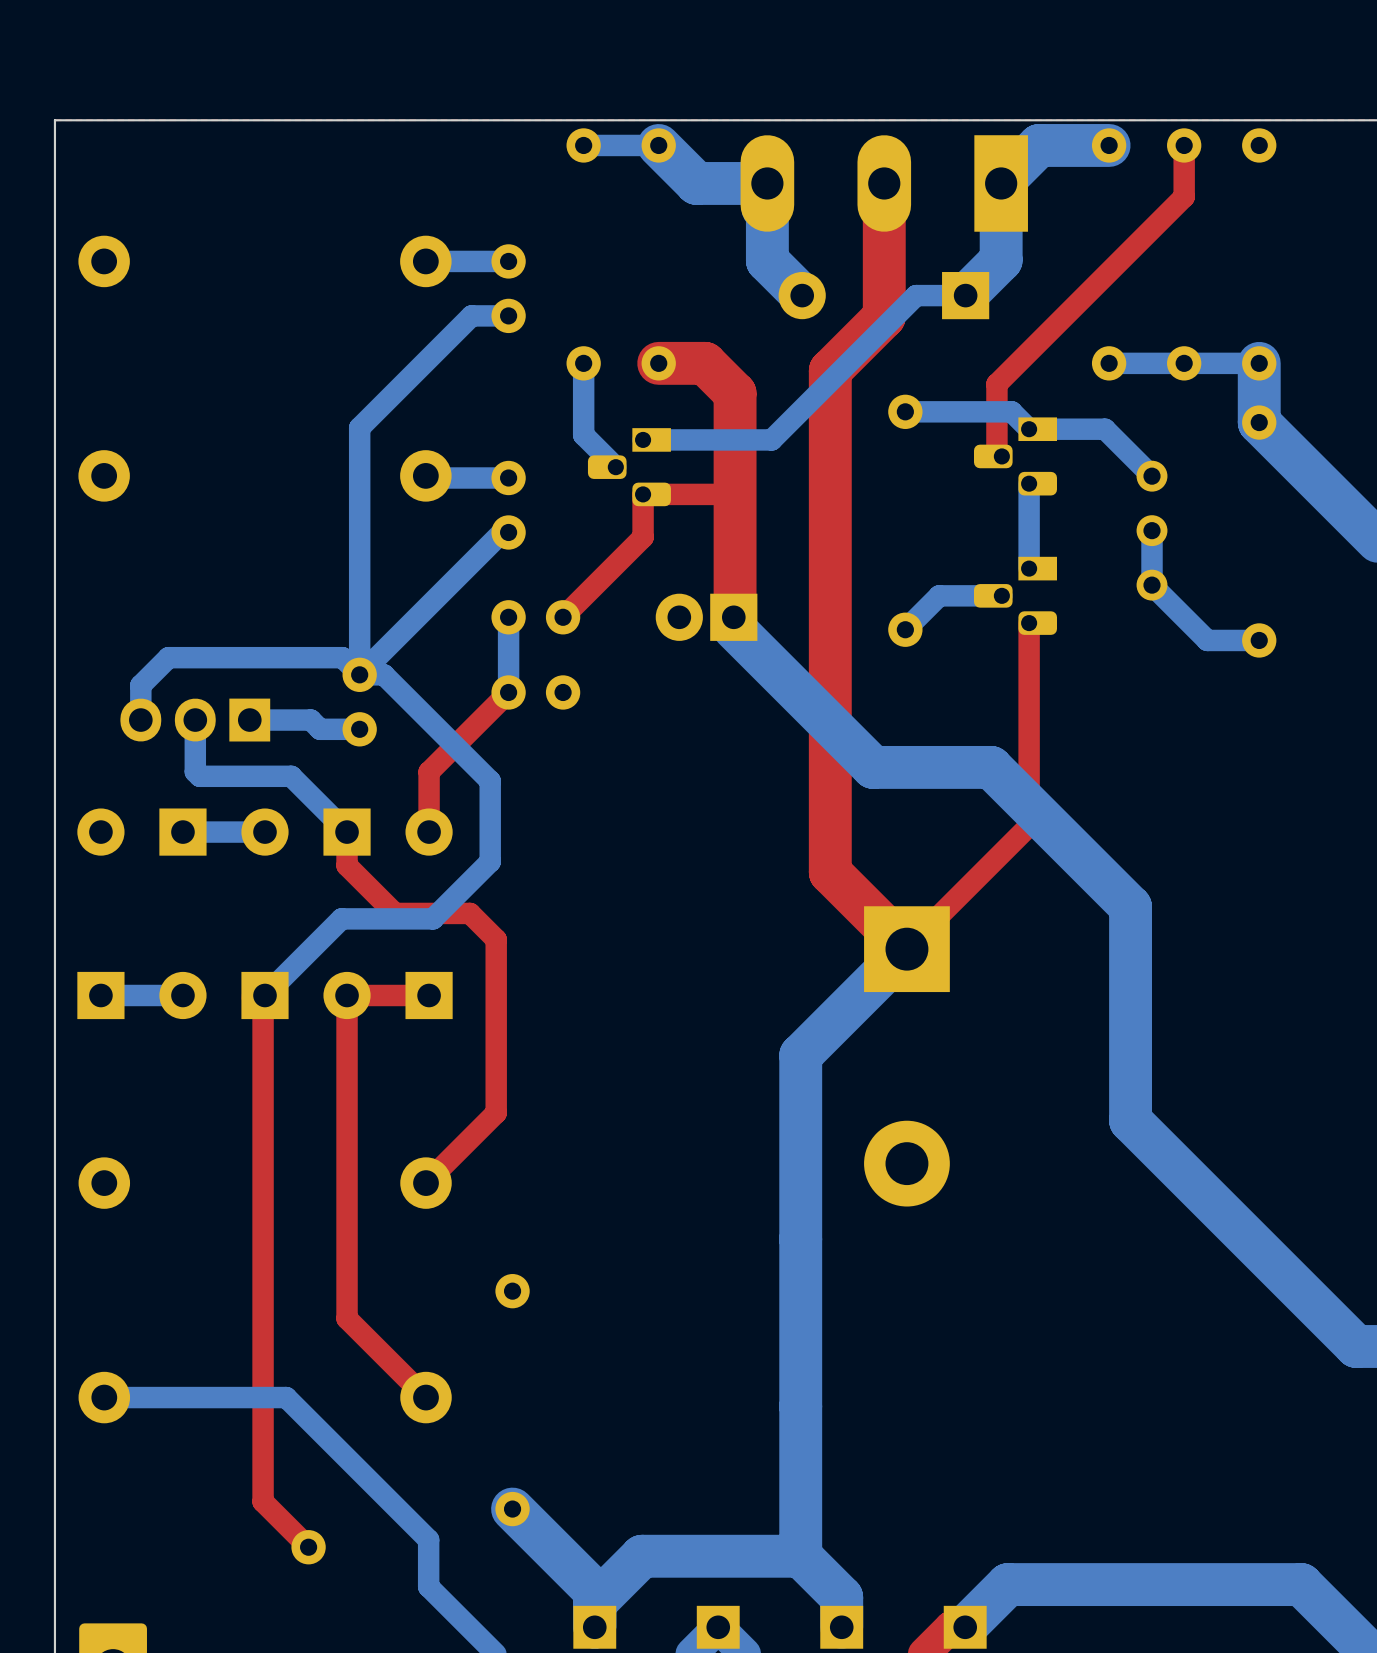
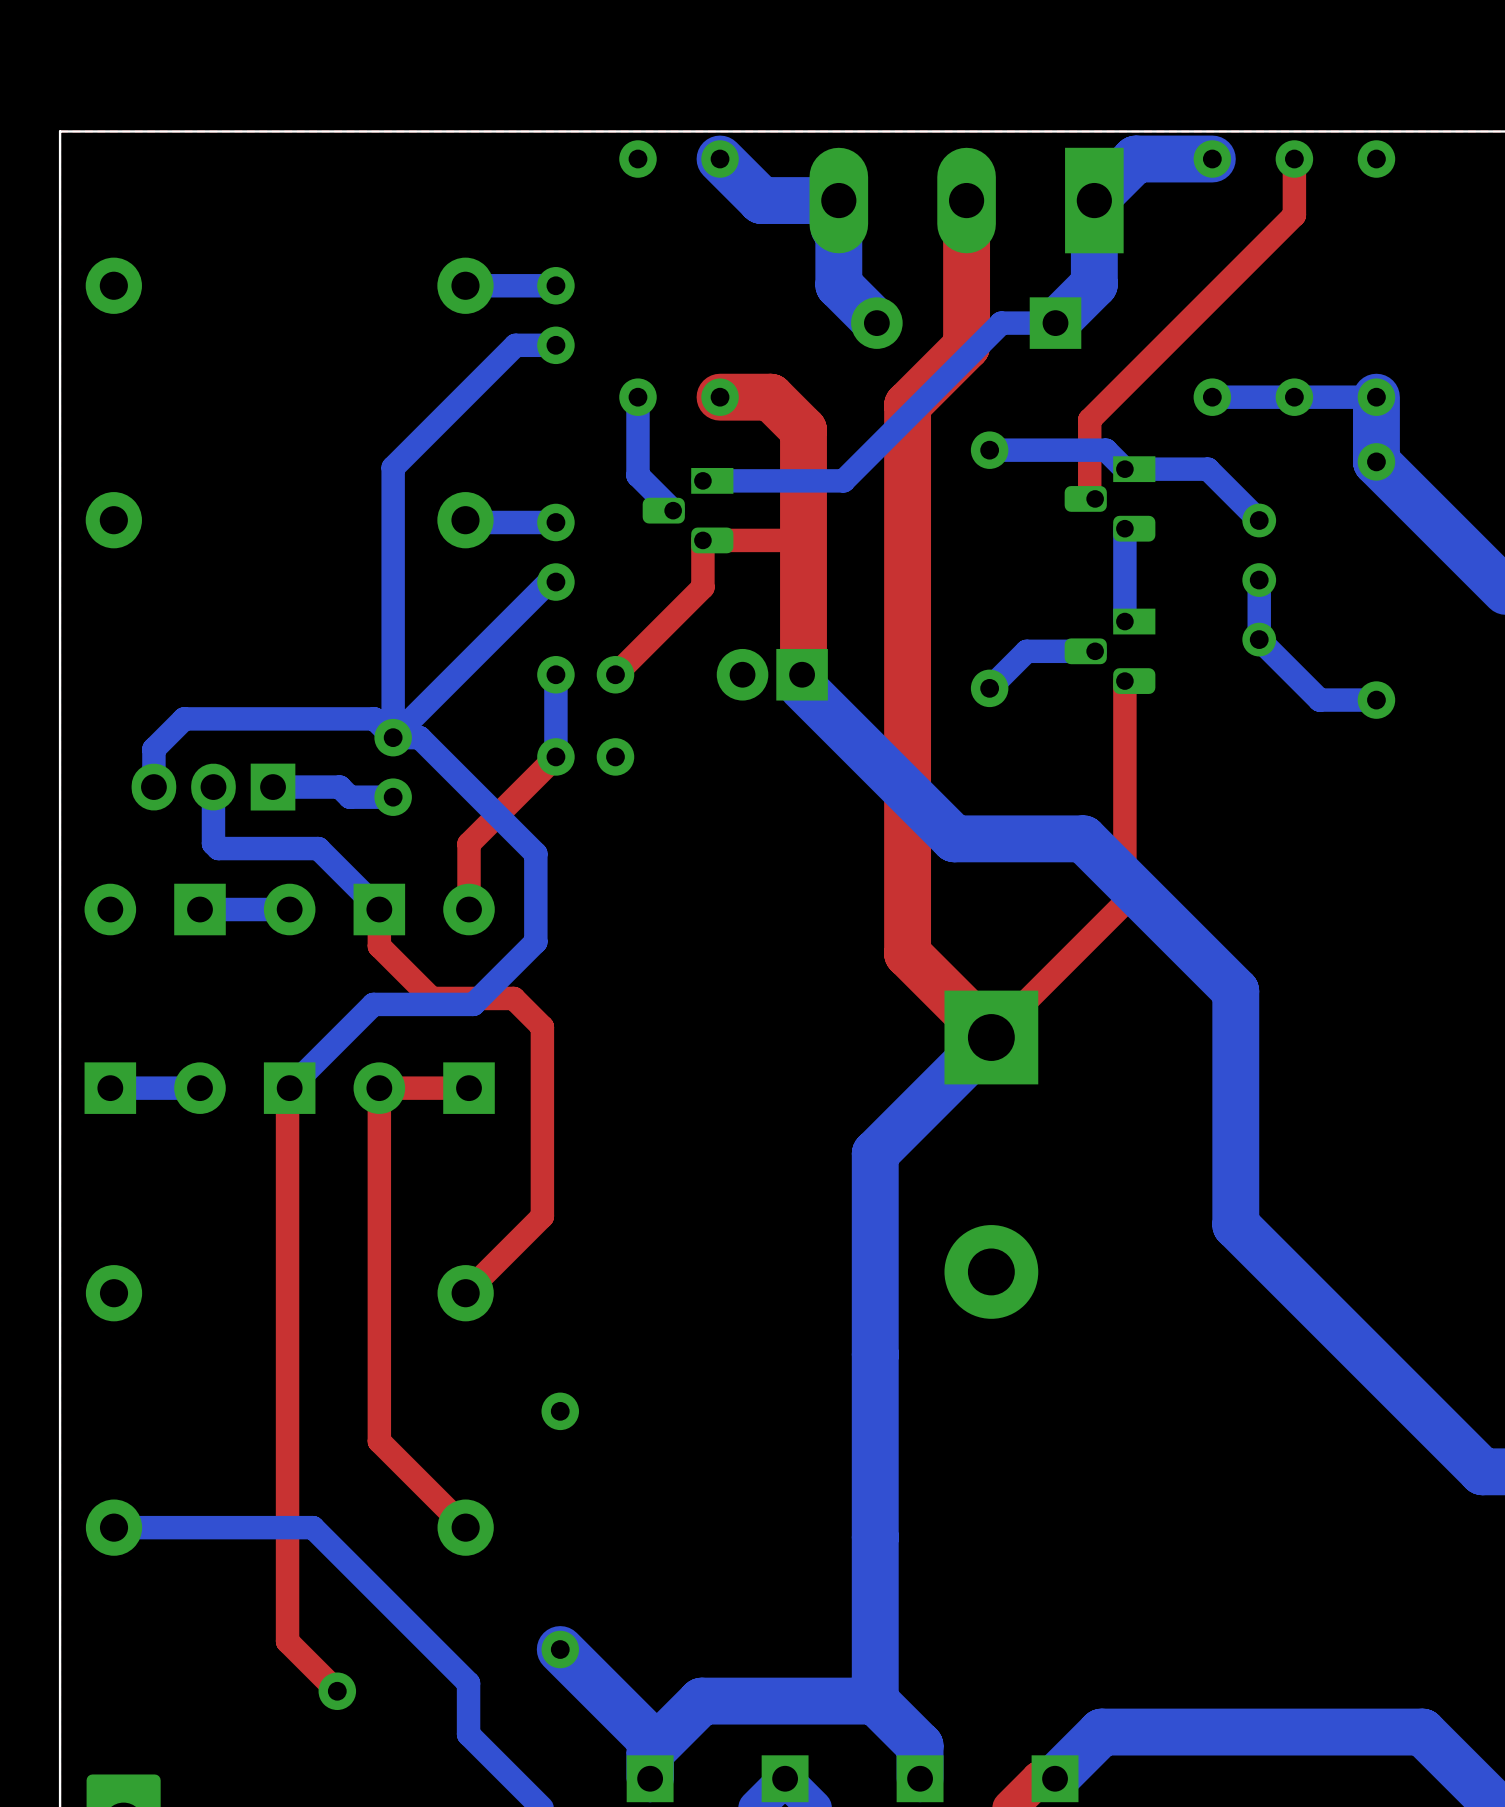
bottom track: (658, 145) (583, 145) -> none

